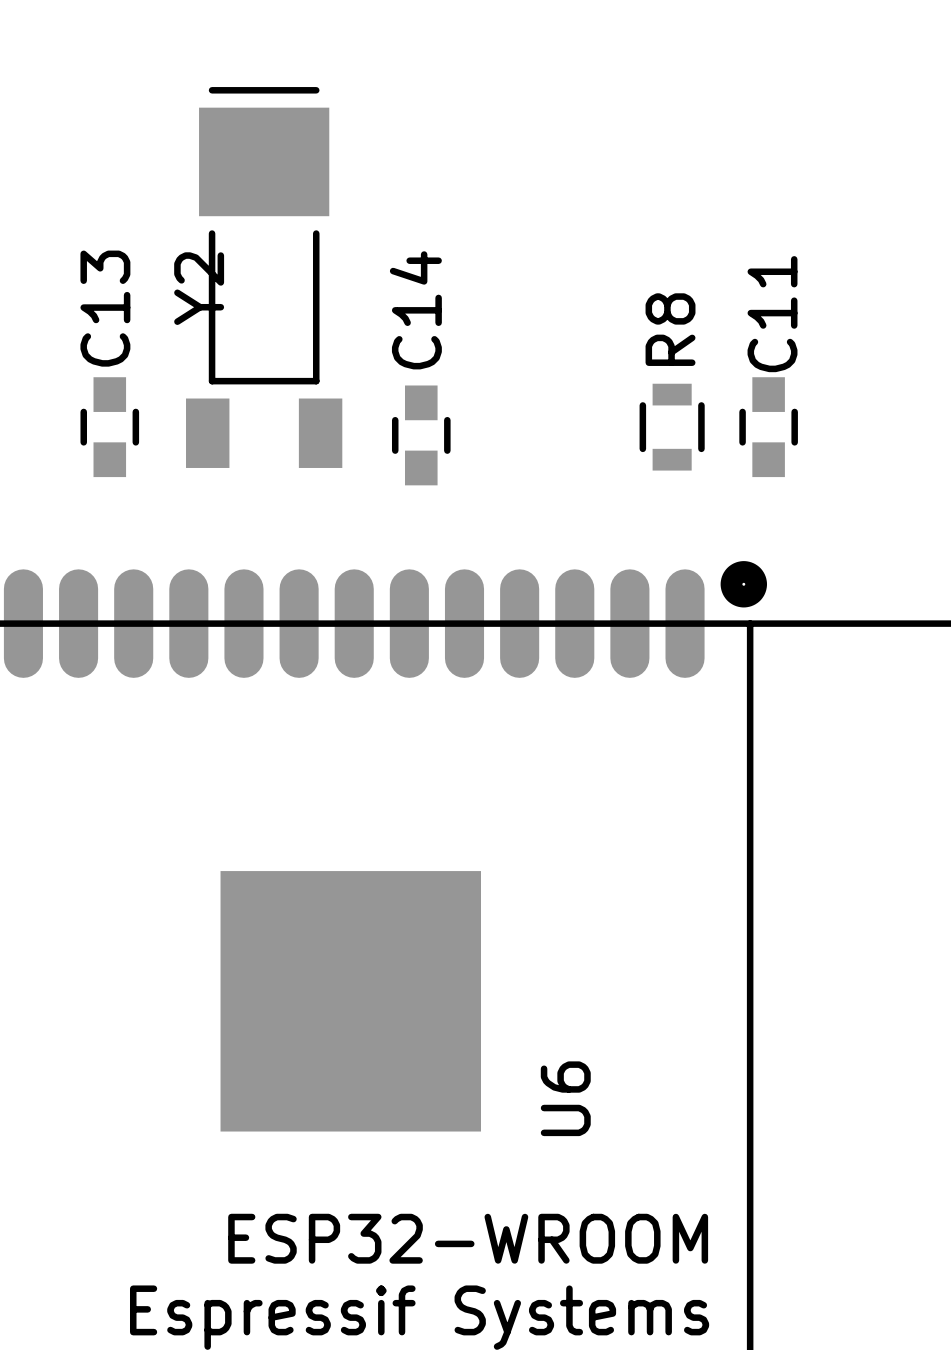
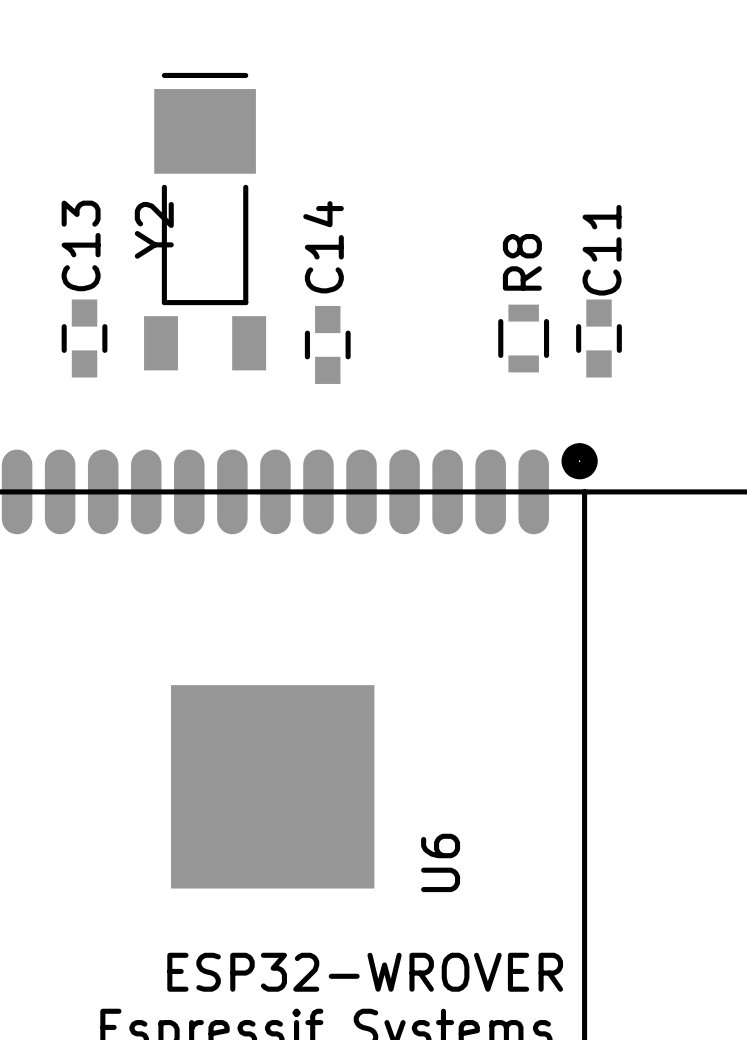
U6 text: ESP32-WROOM (468, 1238) -> ESP32-WROVER (365, 972)

